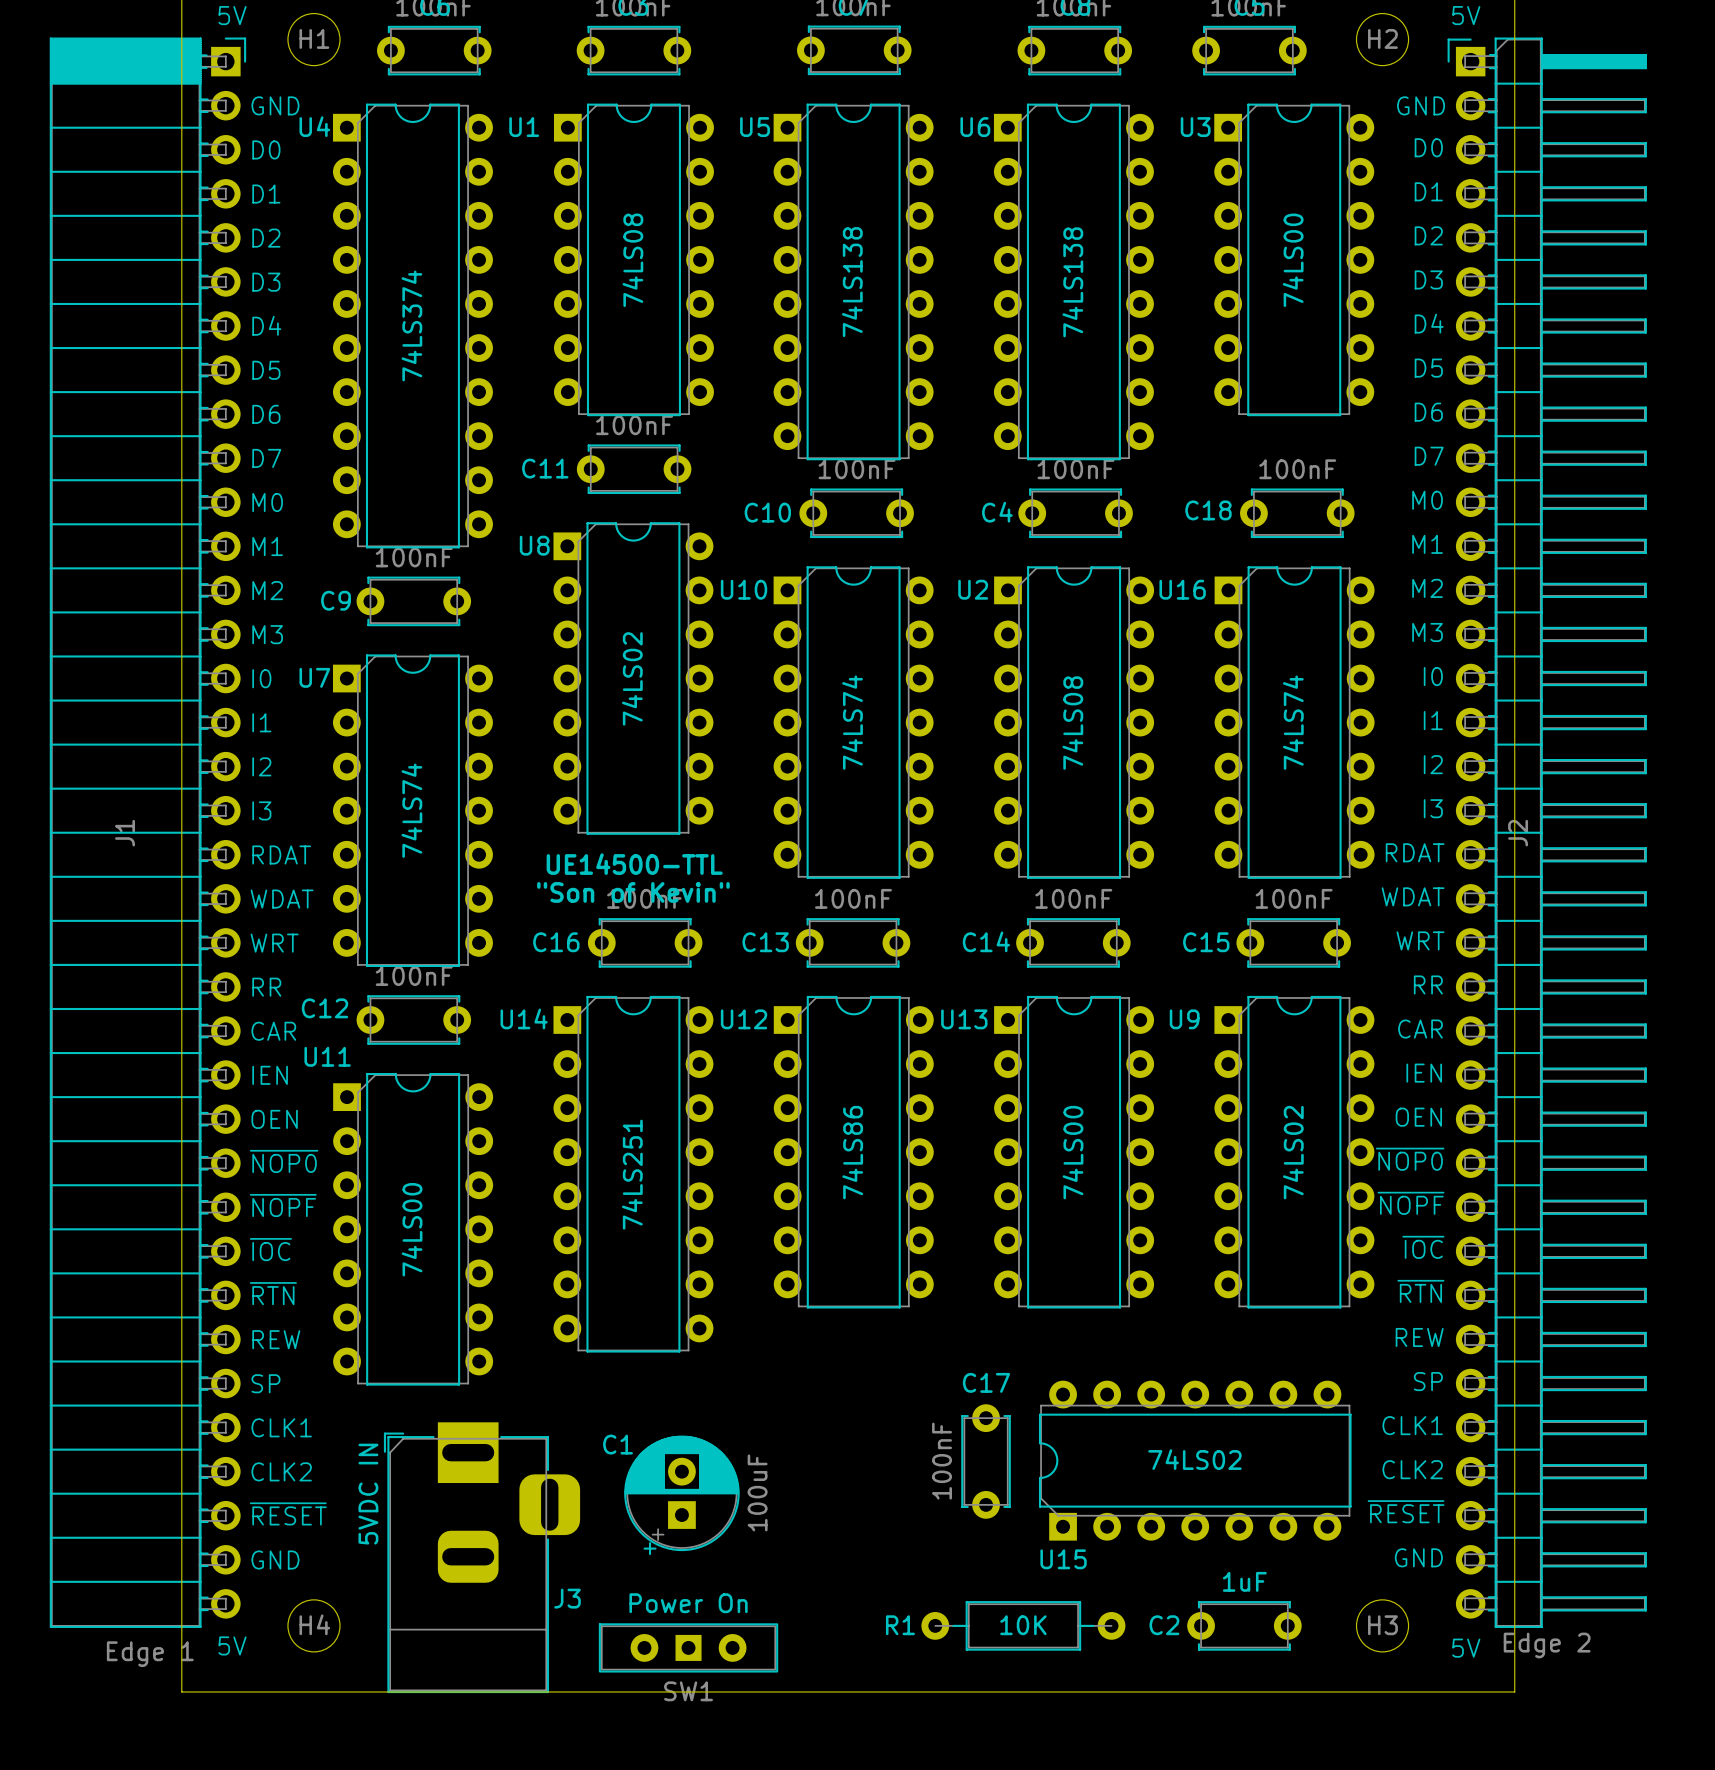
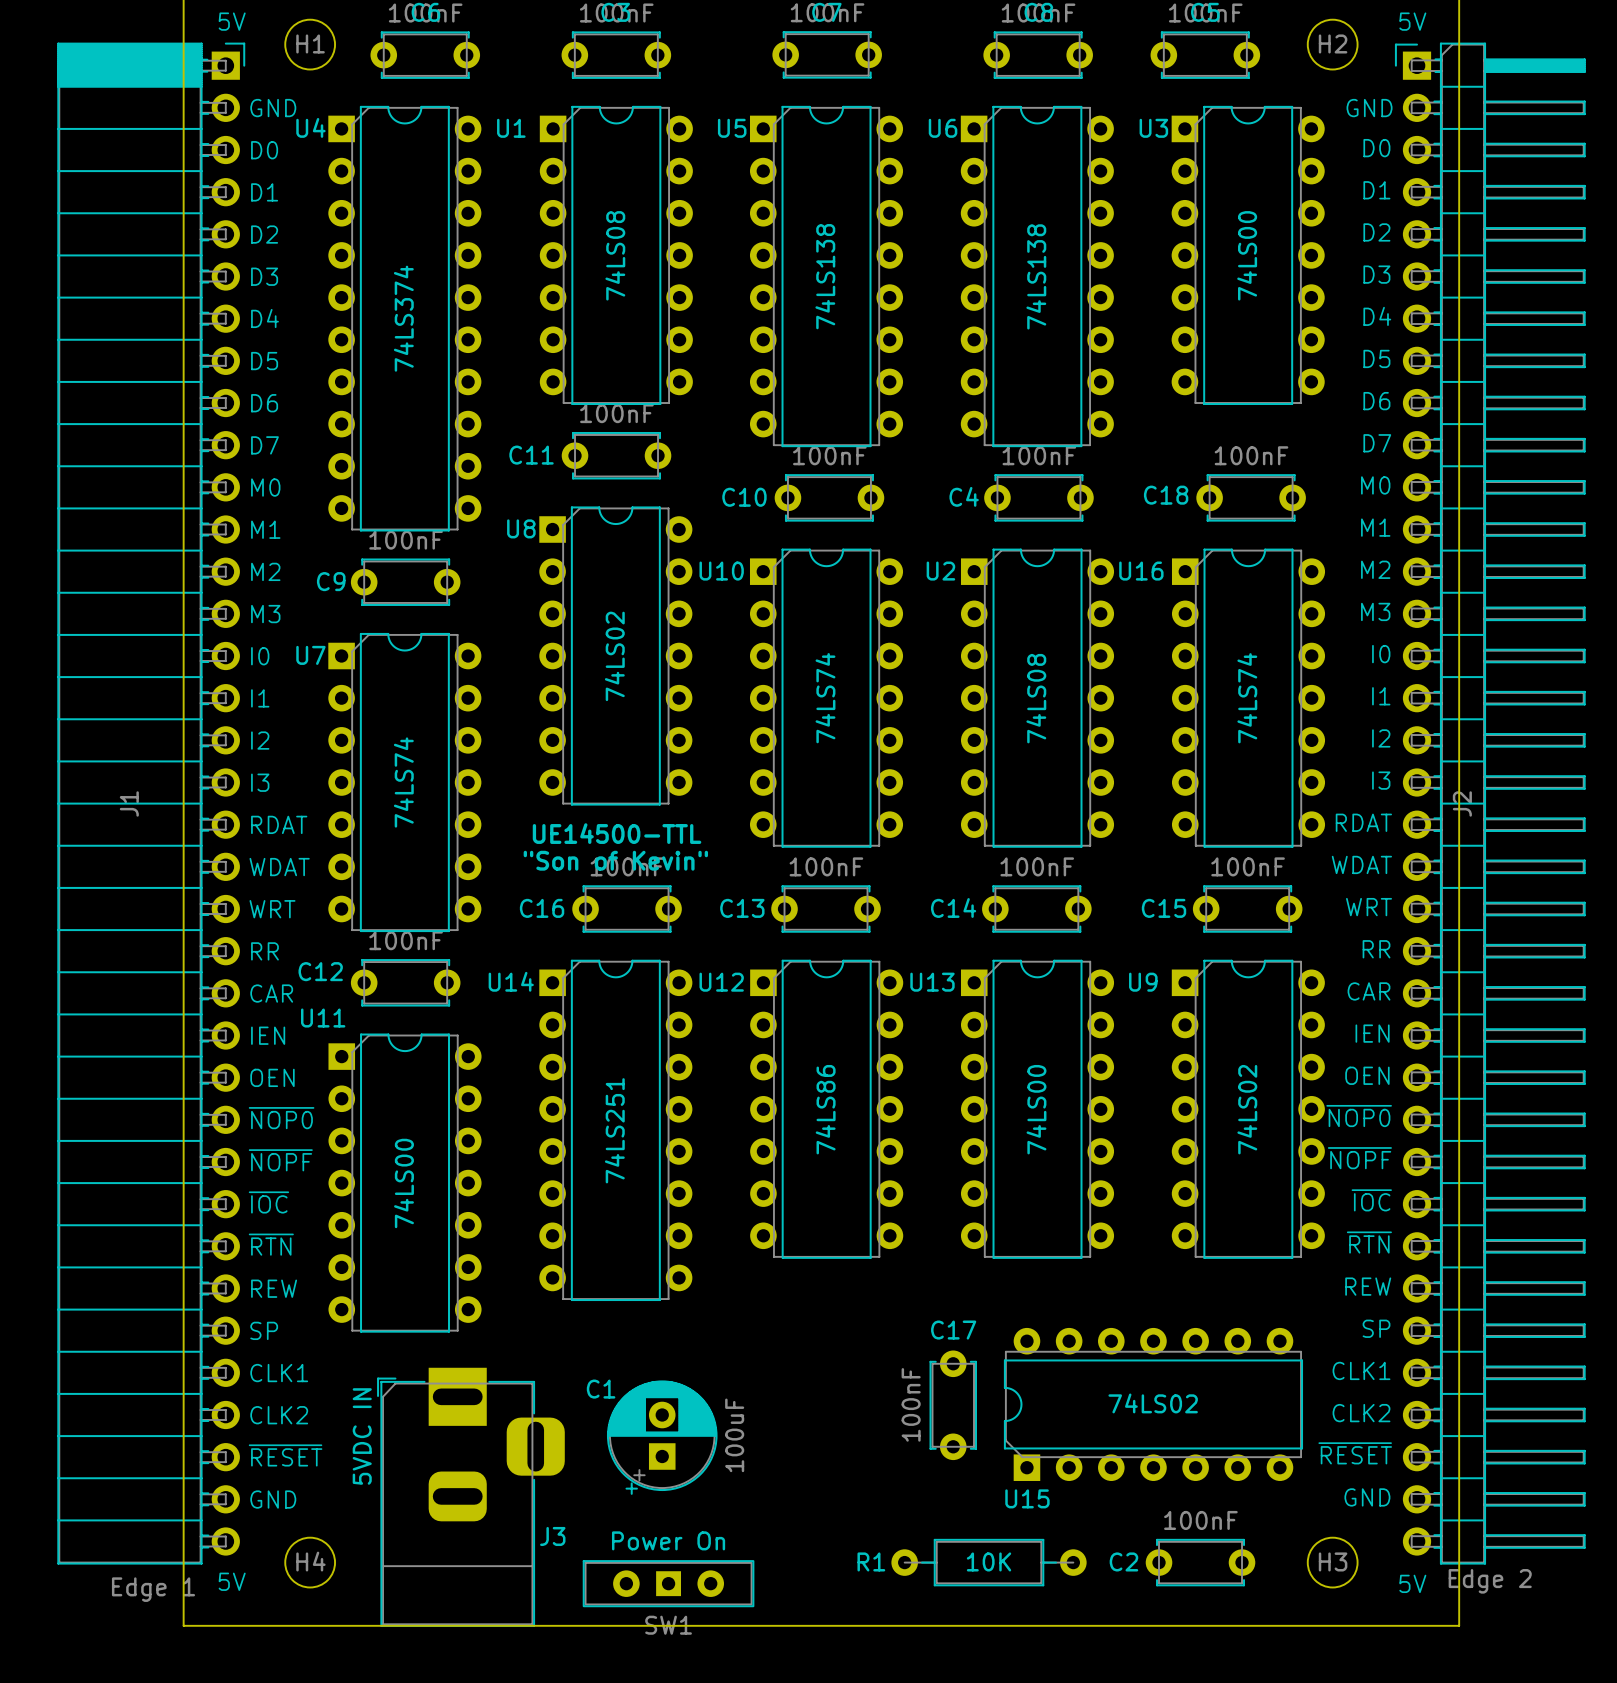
C2 value: 1uF (1244, 1581) -> 100nF (1200, 1520)

